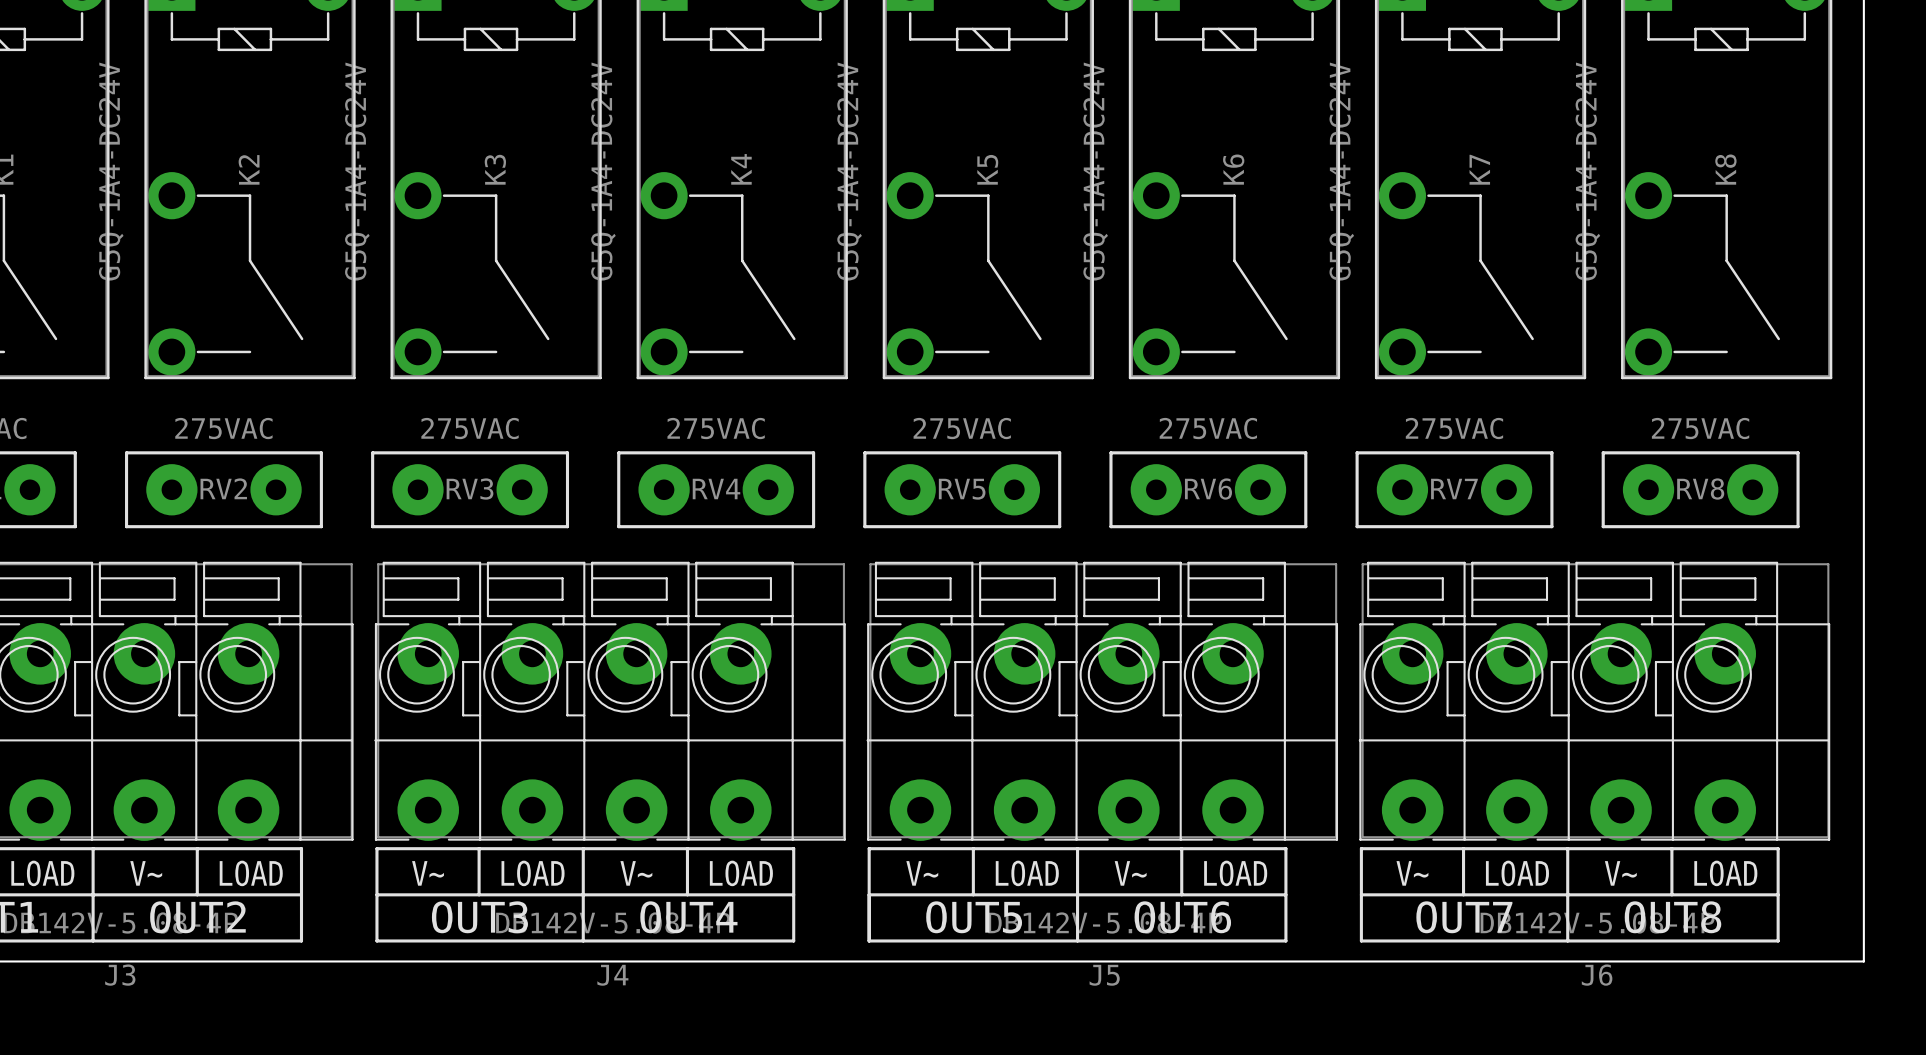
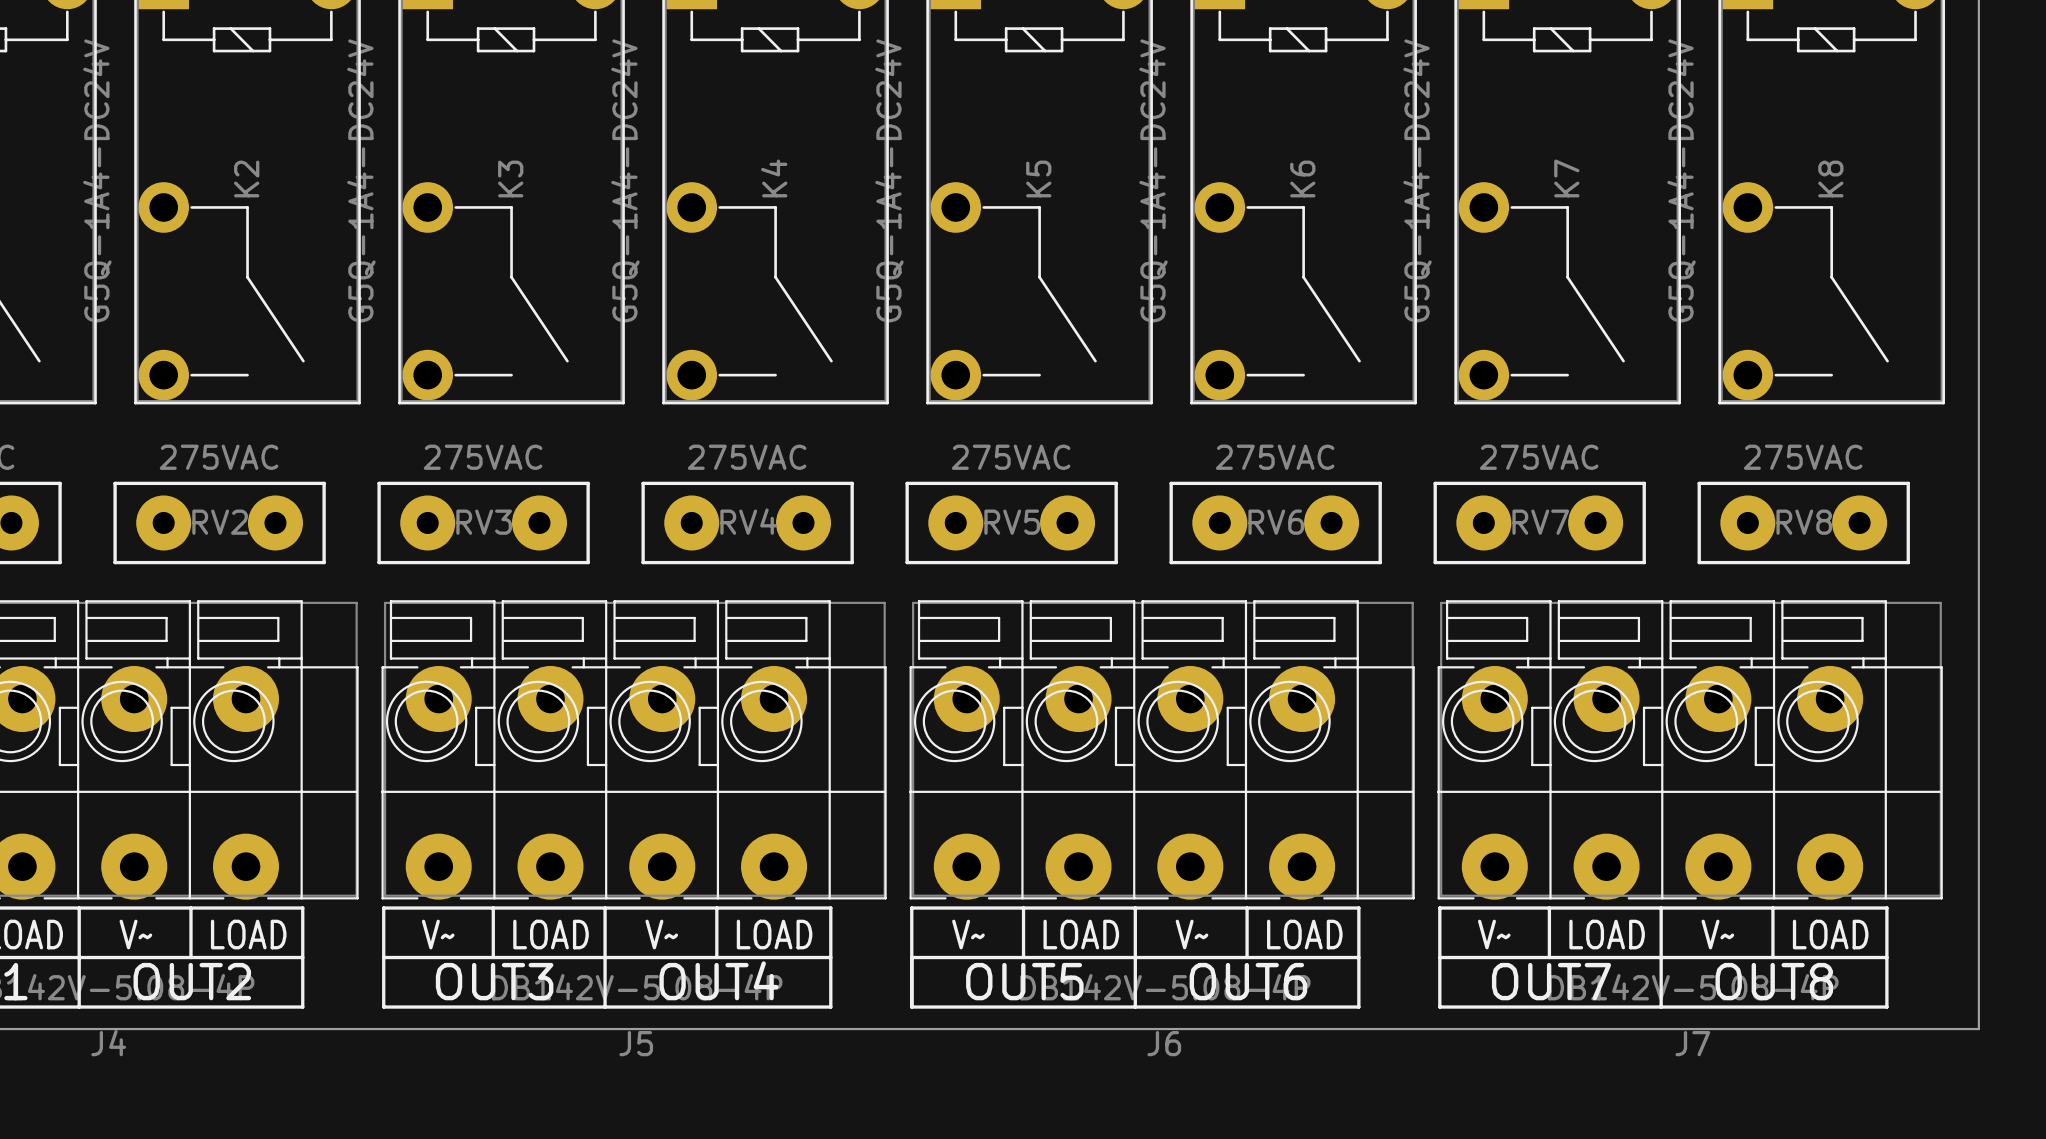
J3 name: J3 (120, 975) -> J4 (108, 1043)
J4 name: J4 (612, 975) -> J5 (636, 1043)
J5 name: J5 (1104, 975) -> J6 (1164, 1043)
J6 name: J6 (1597, 975) -> J7 (1692, 1043)

